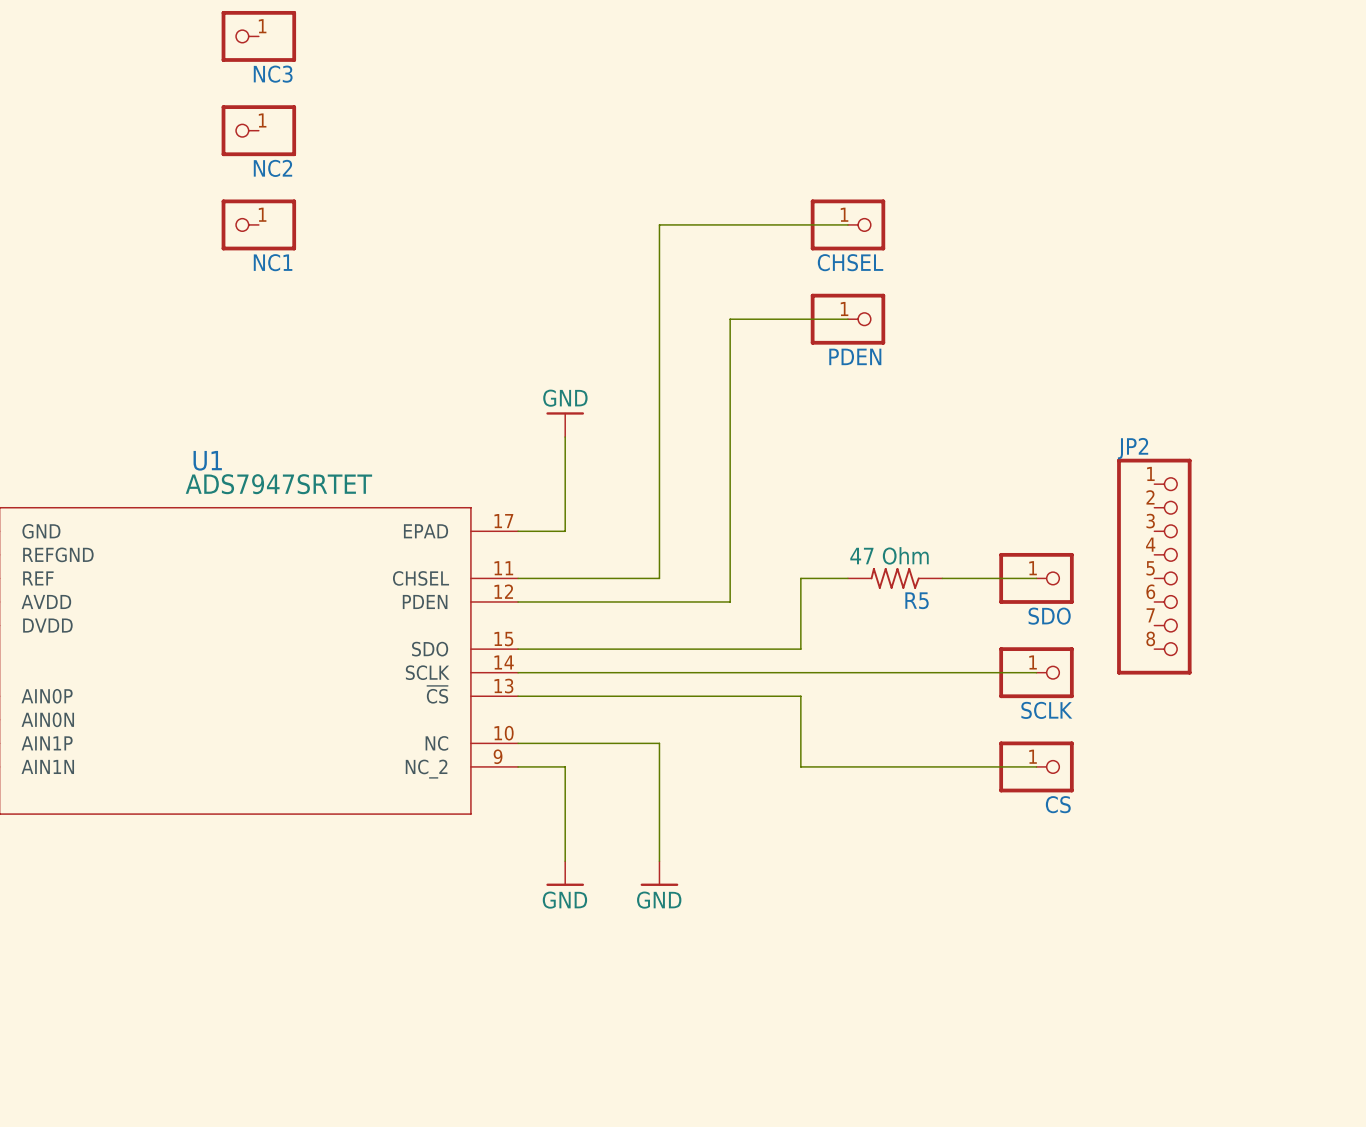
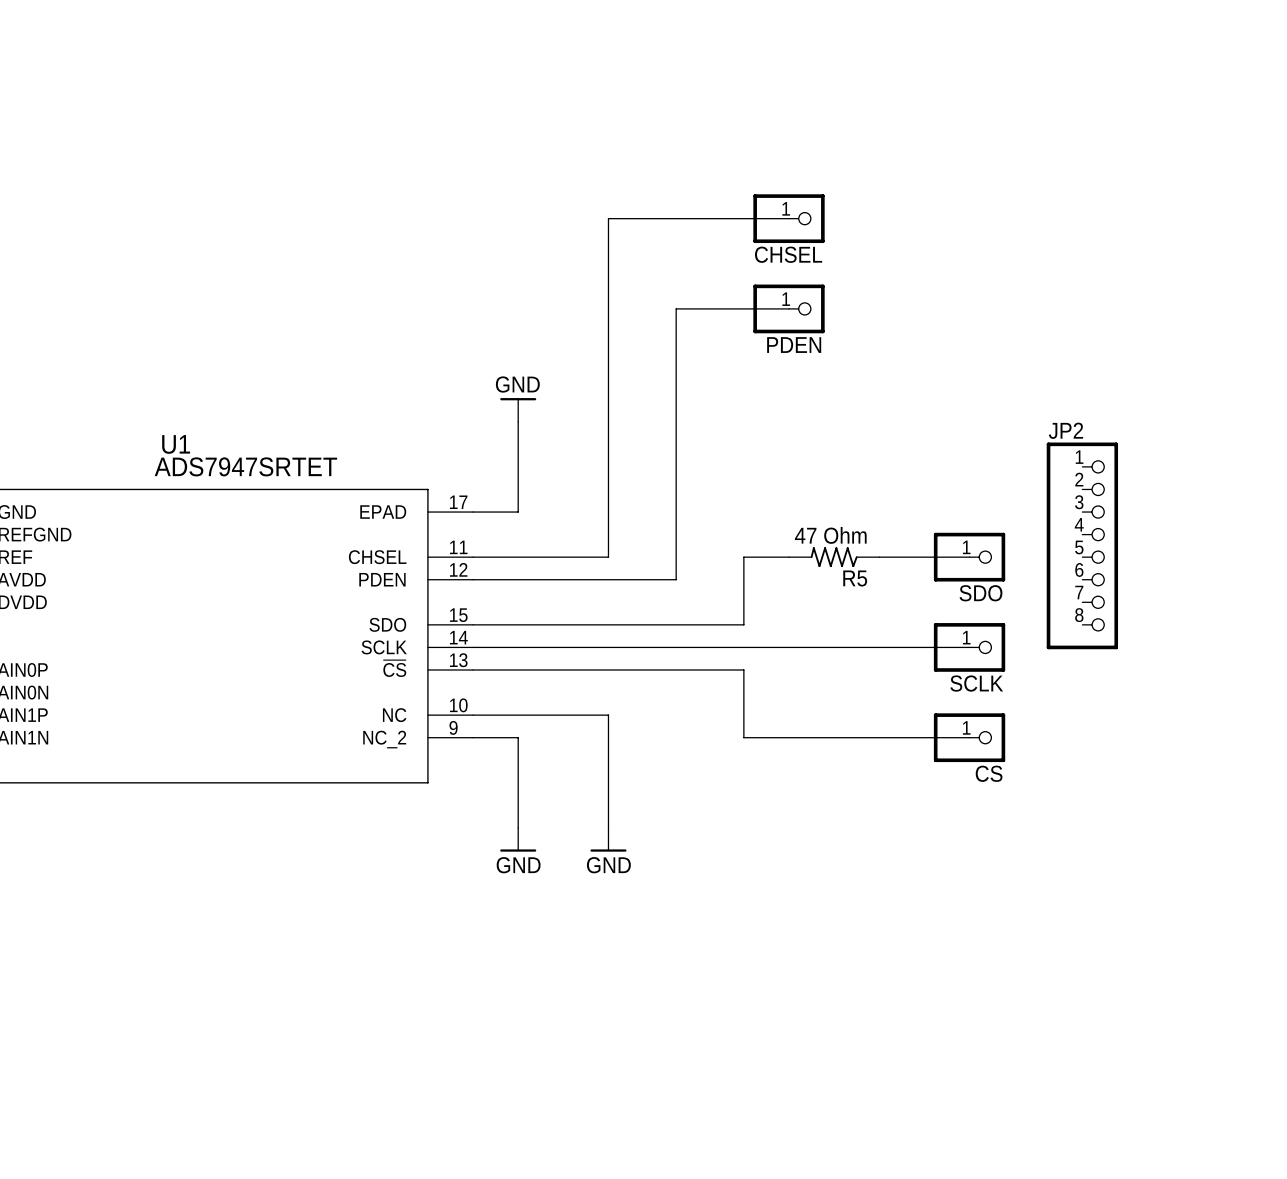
NC3: (258, 36) -> none
NC2: (258, 130) -> none
NC1: (258, 224) -> none

